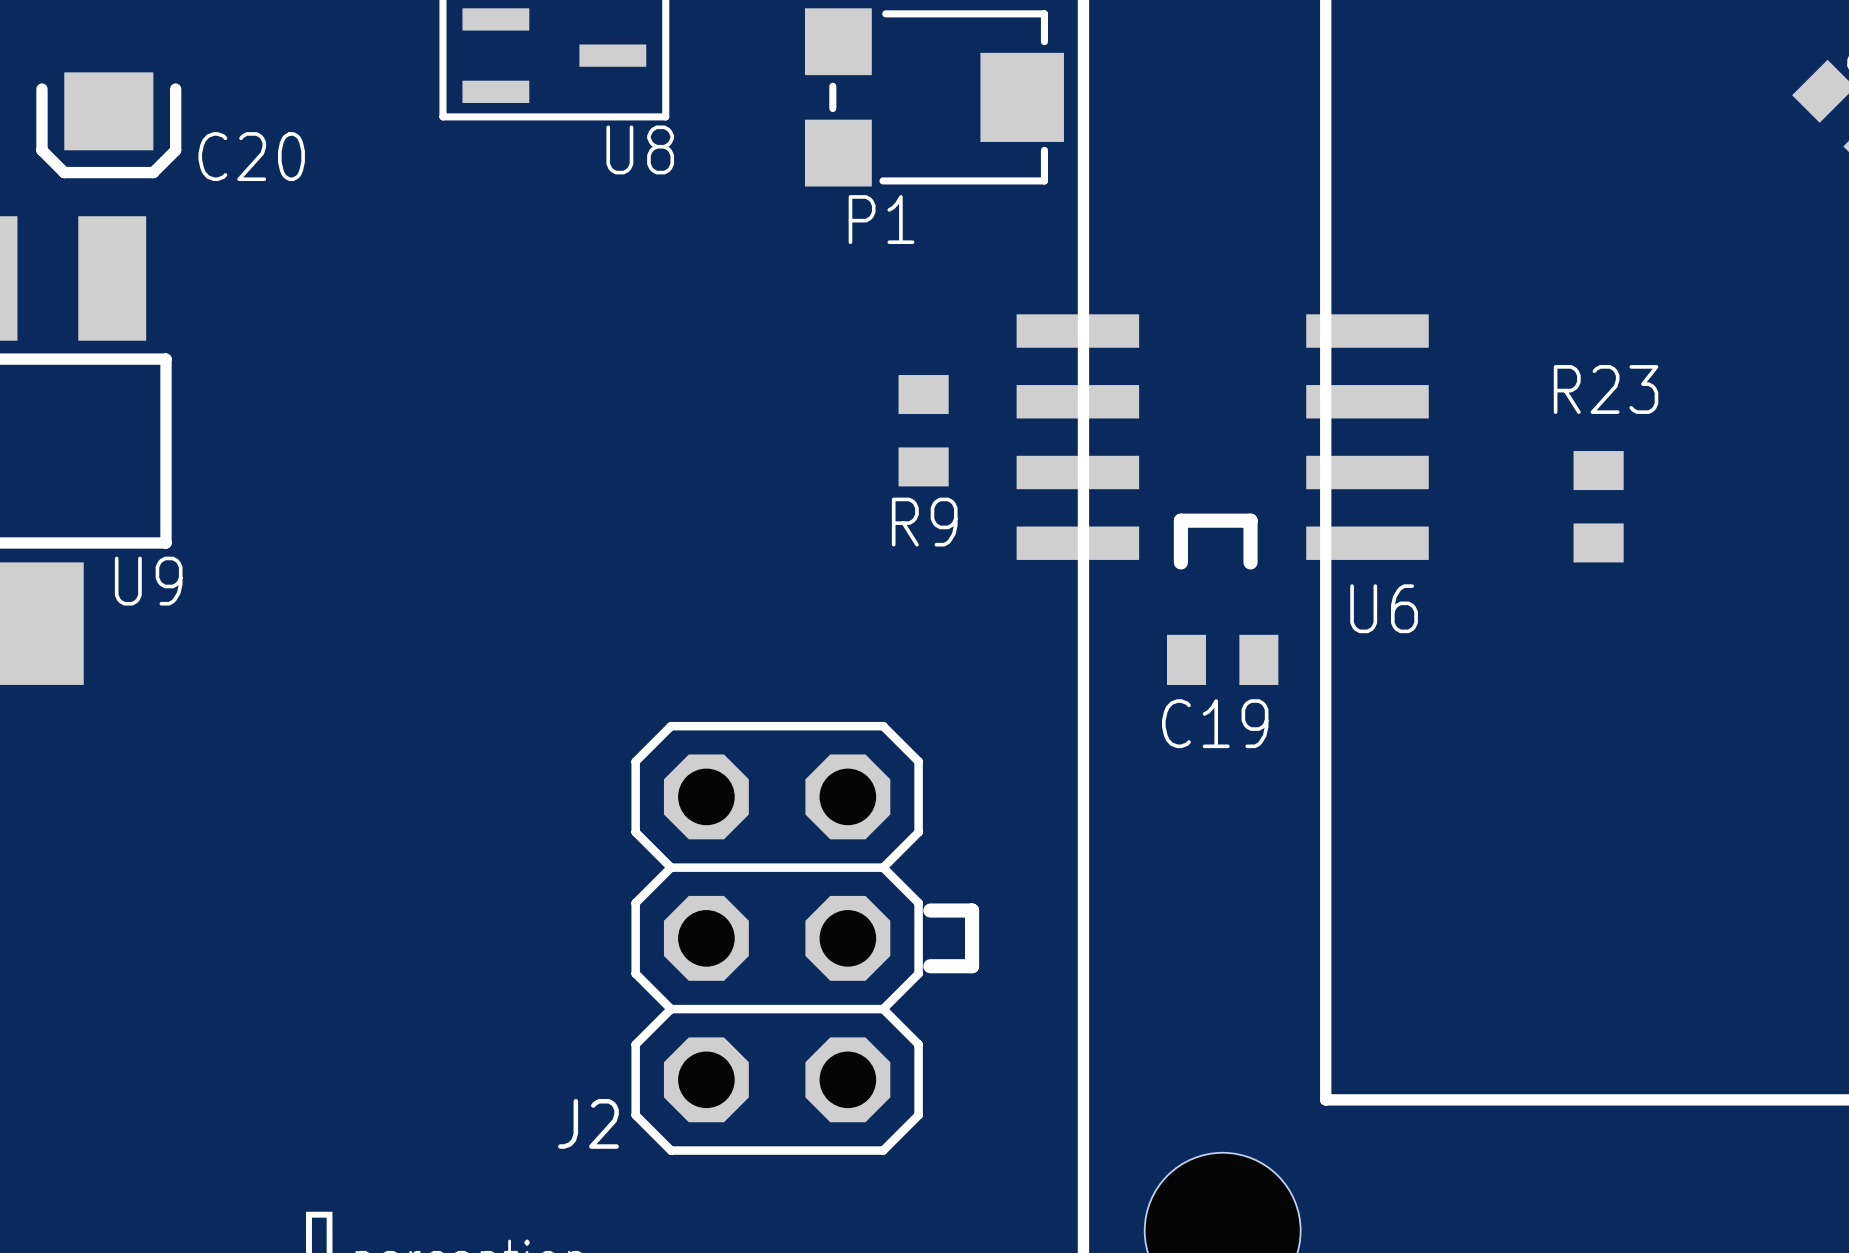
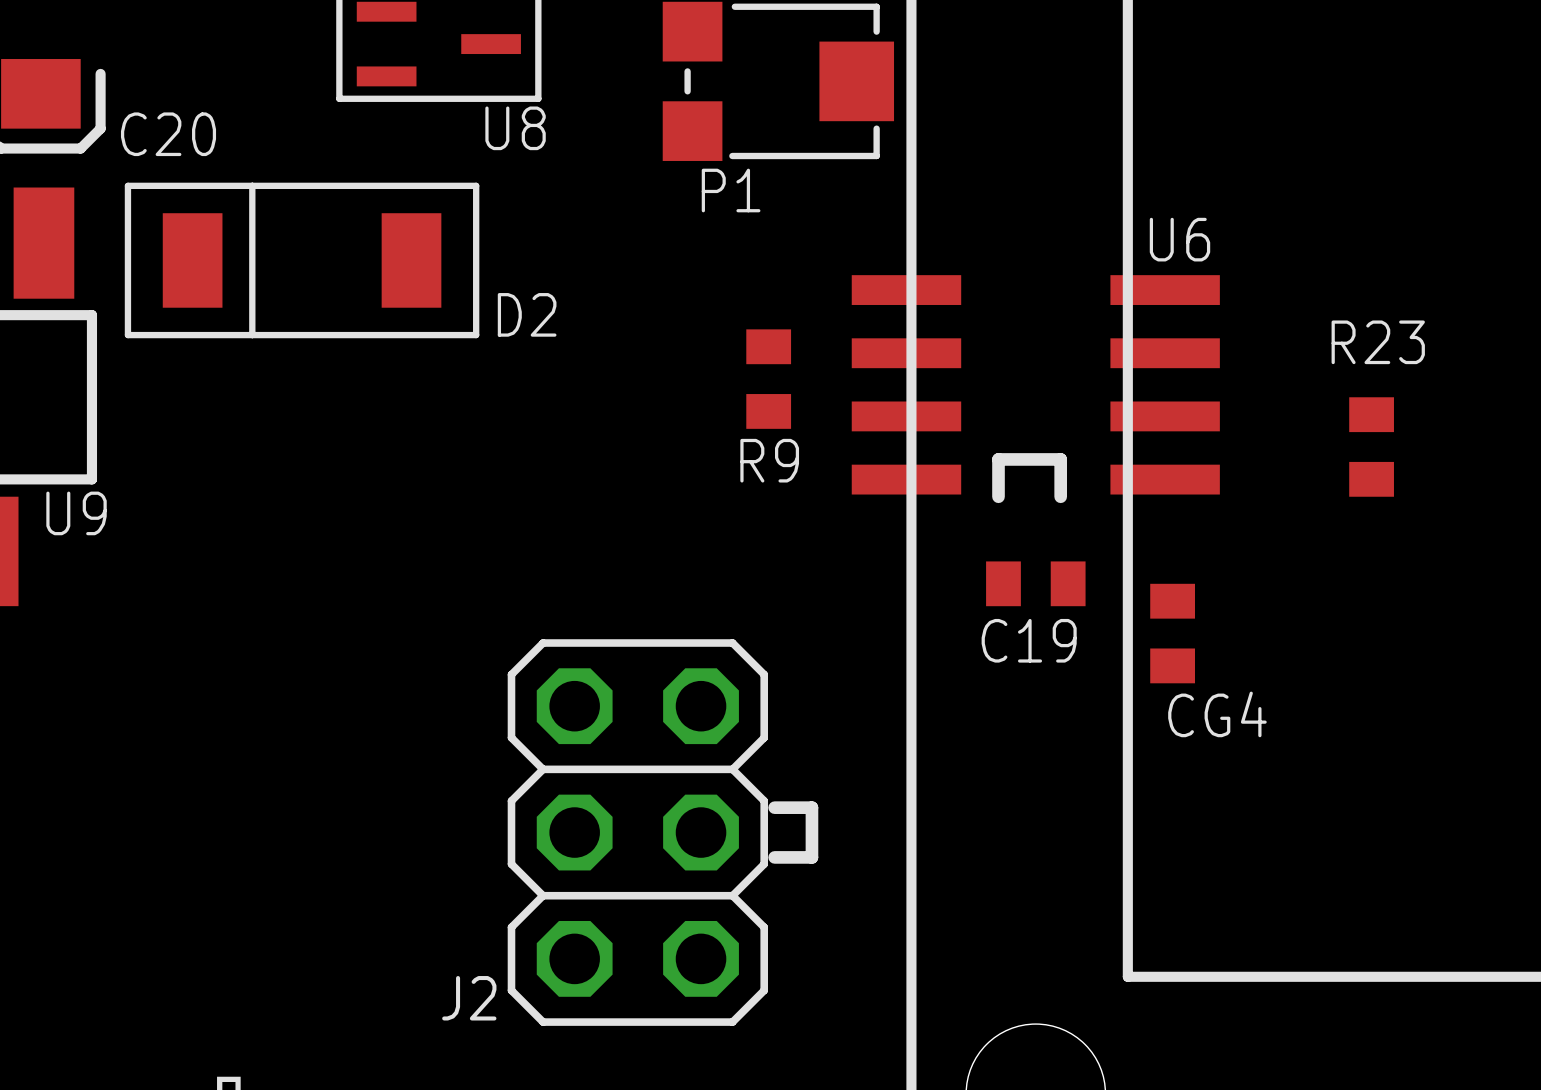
D2: none -> (302, 260)
U6 name position: U6 (1384, 608) -> U6 (1179, 239)
CG4: none -> (1172, 633)

